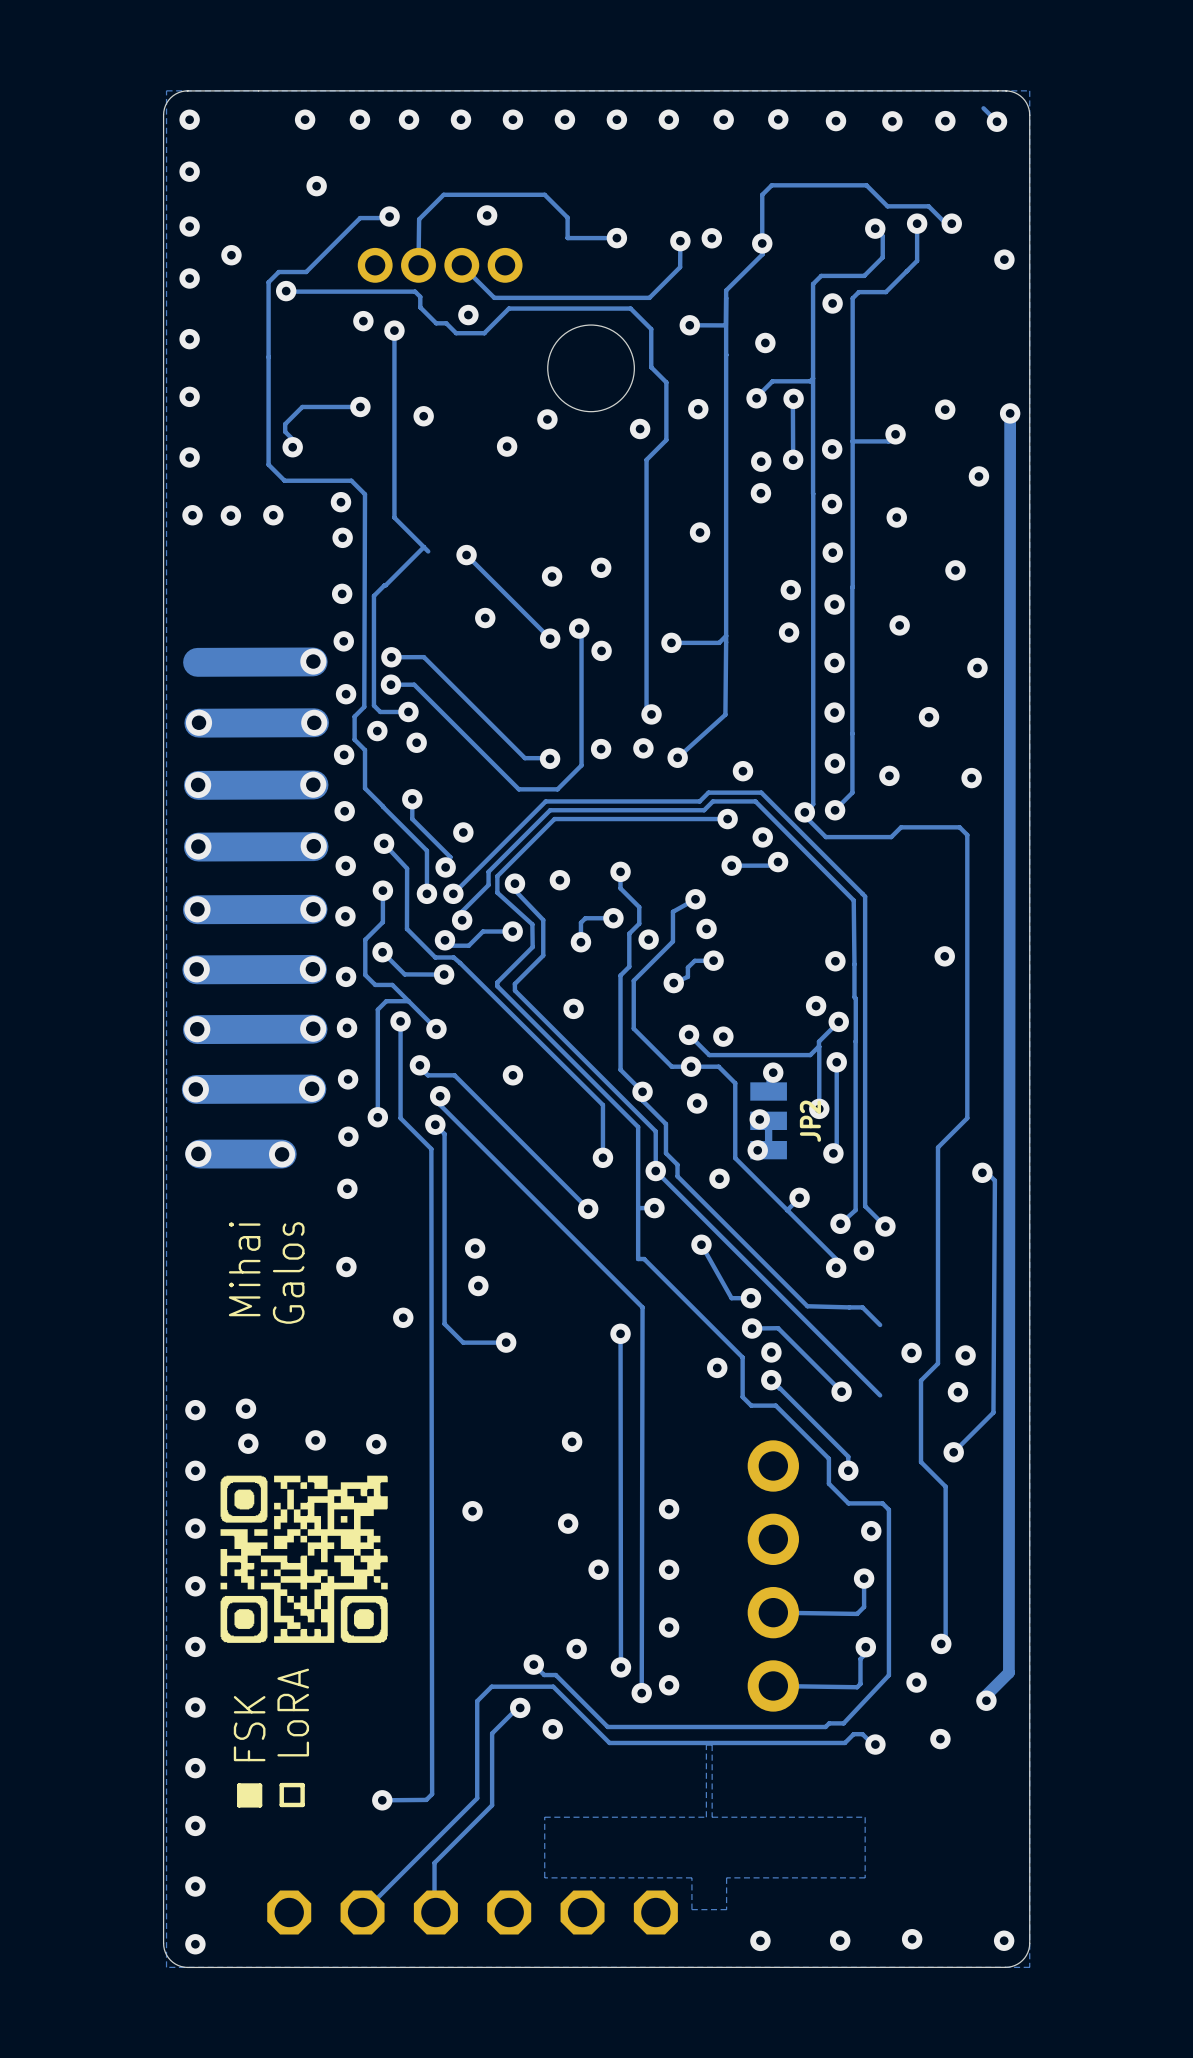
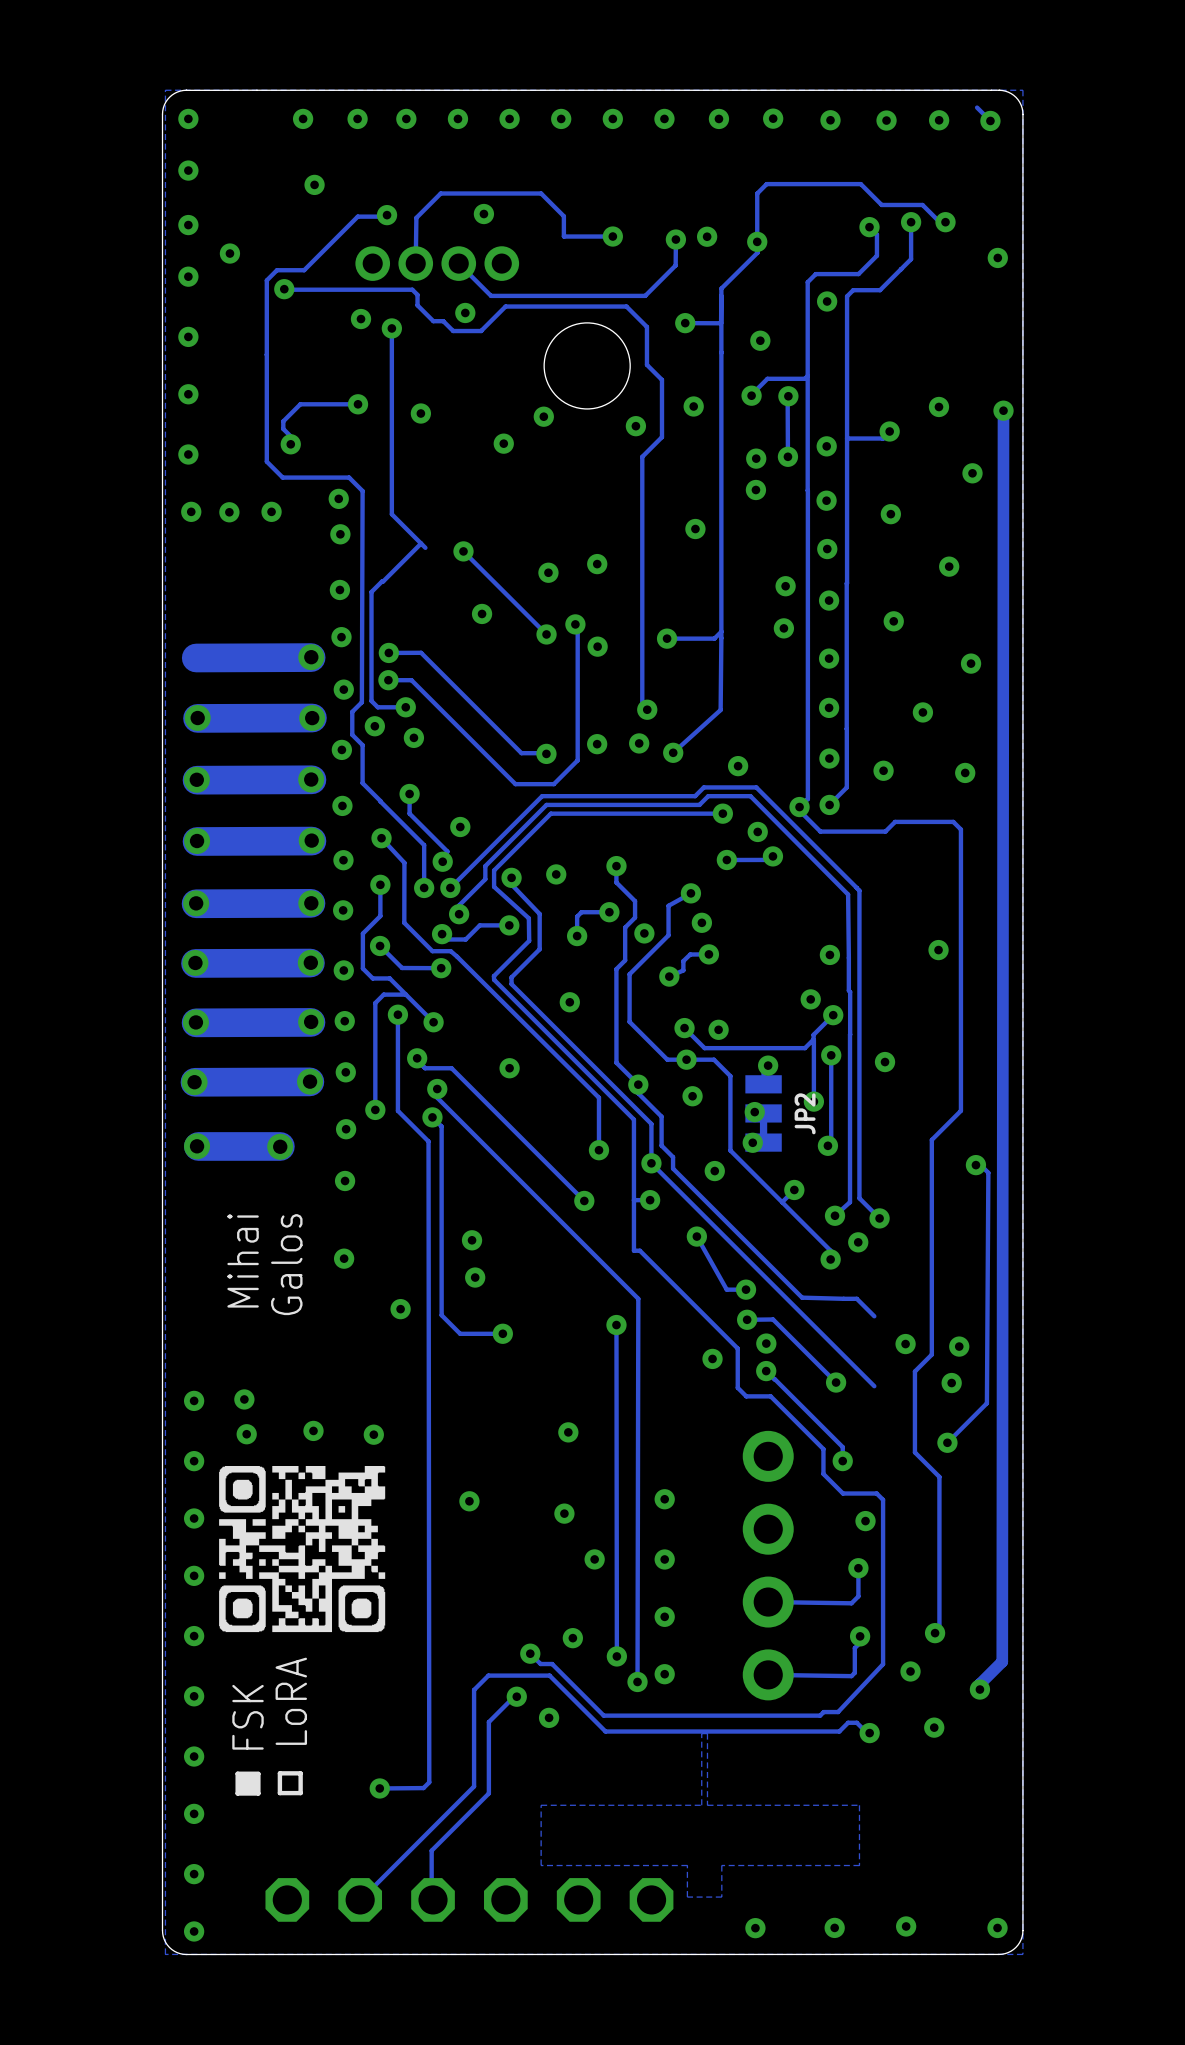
via: none -> (885, 1062)

